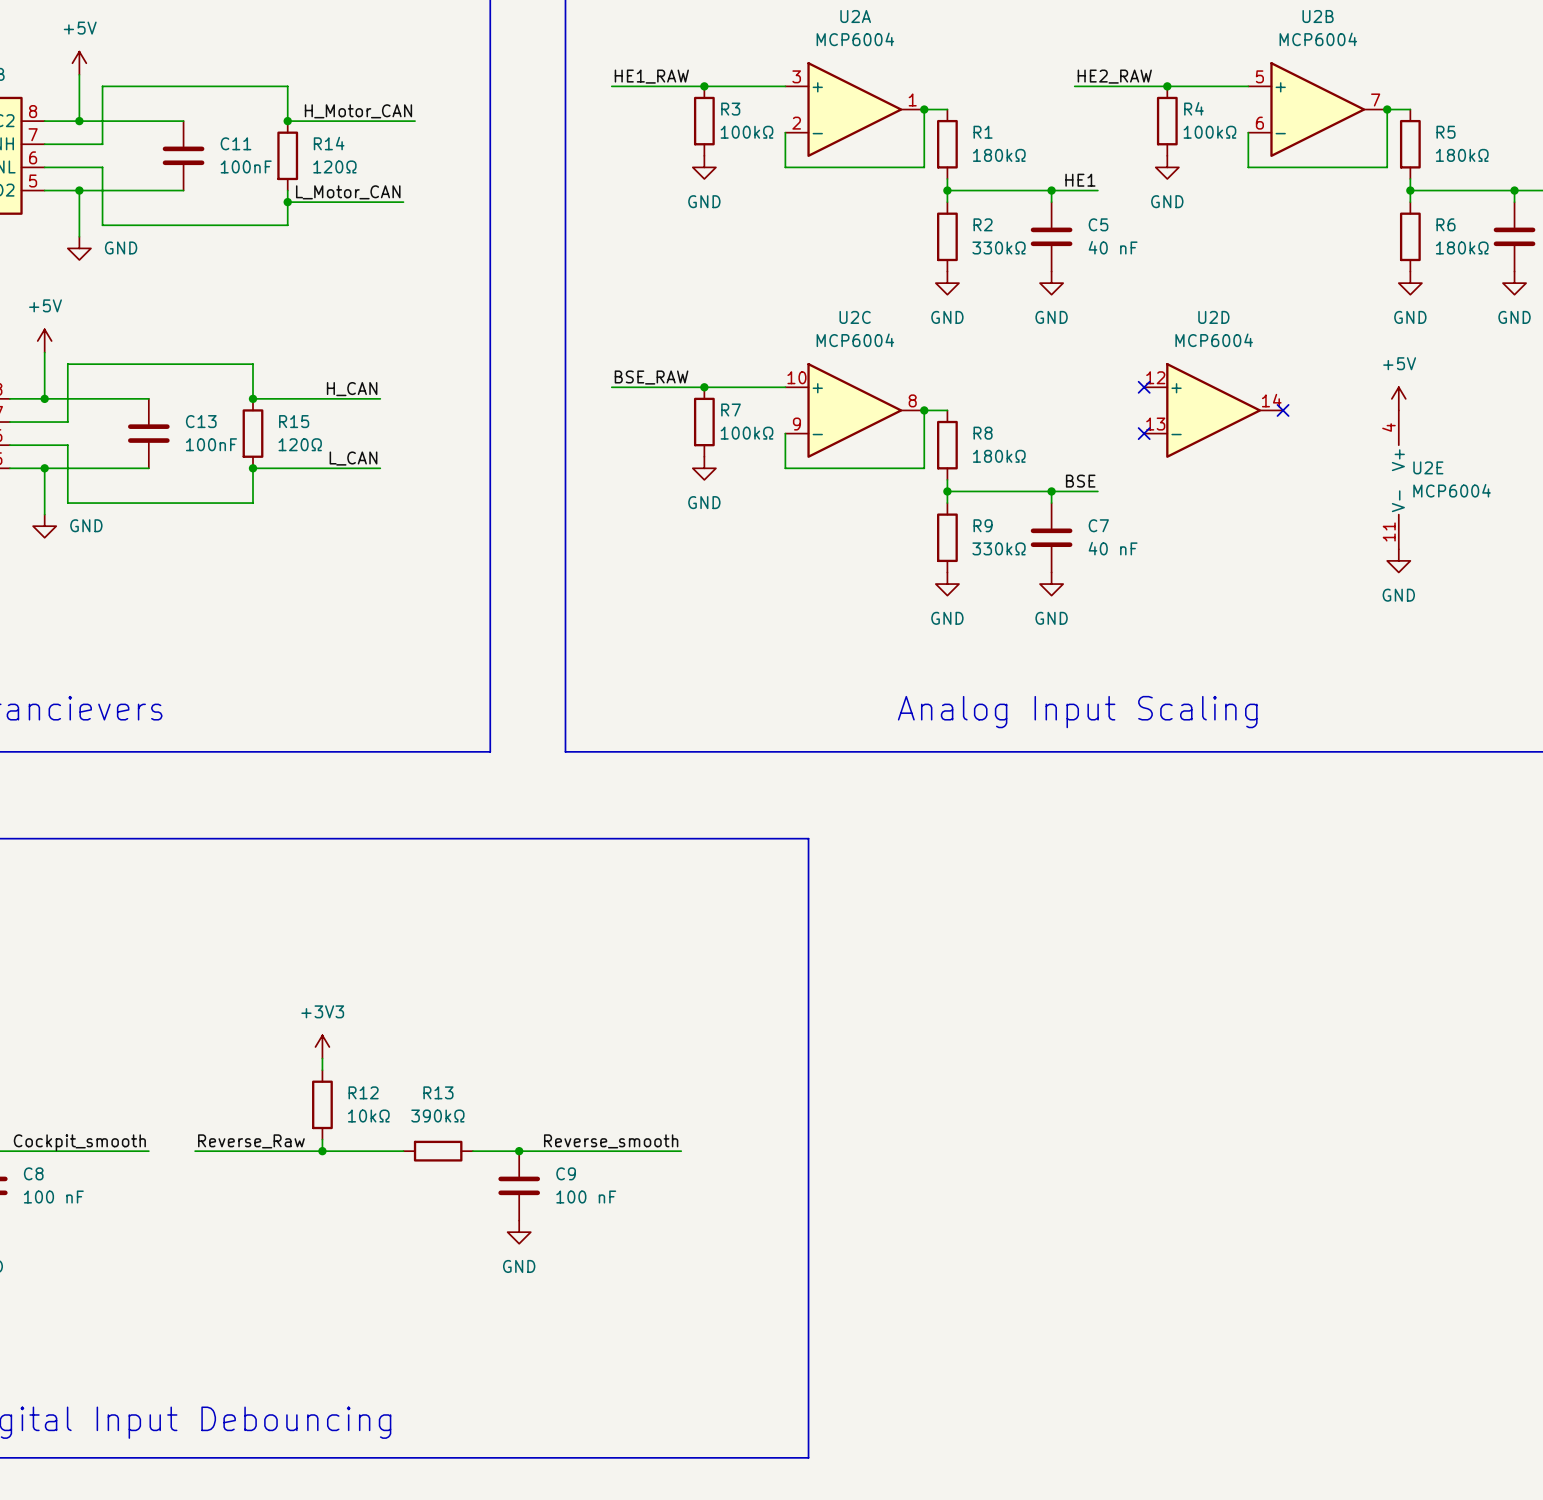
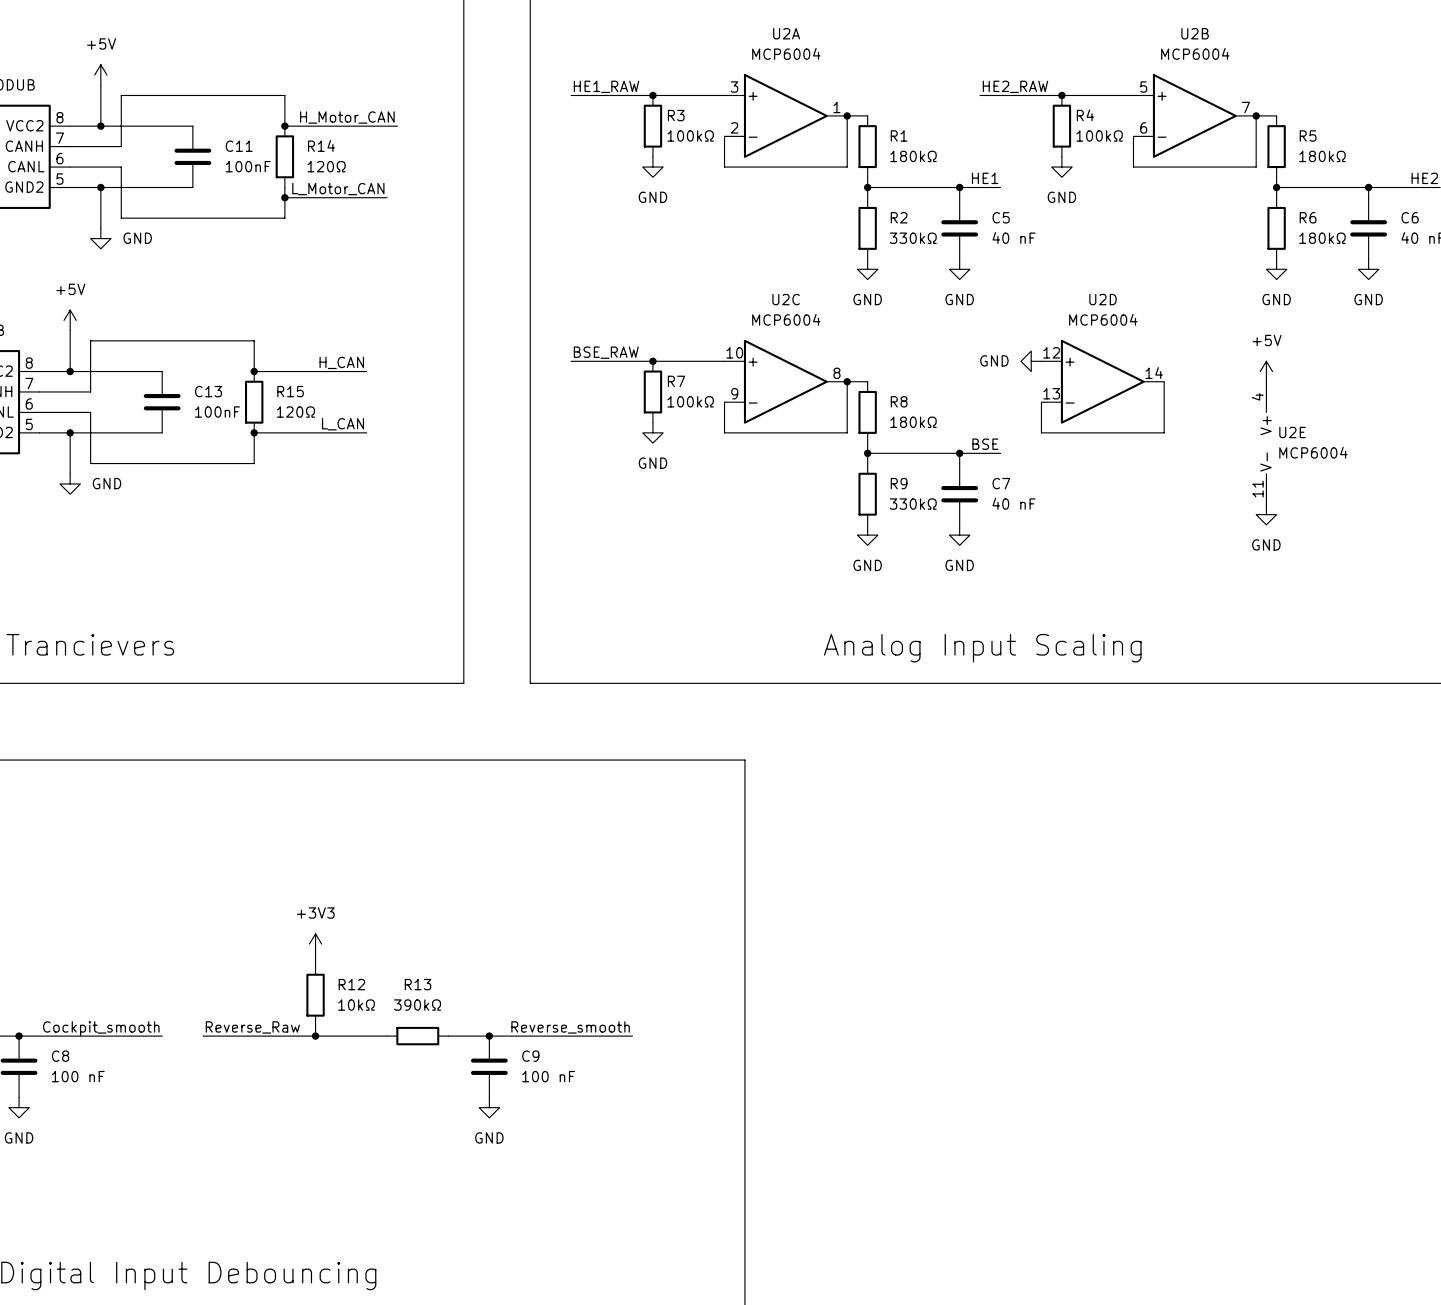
power symbol: none -> GND (1031, 361)
no-connect mark: (1144, 387) -> none
wire: none -> (1164, 381) (1164, 432) (1041, 432) (1041, 402)
no-connect mark: (1283, 410) -> none
no-connect mark: (1144, 433) -> none

